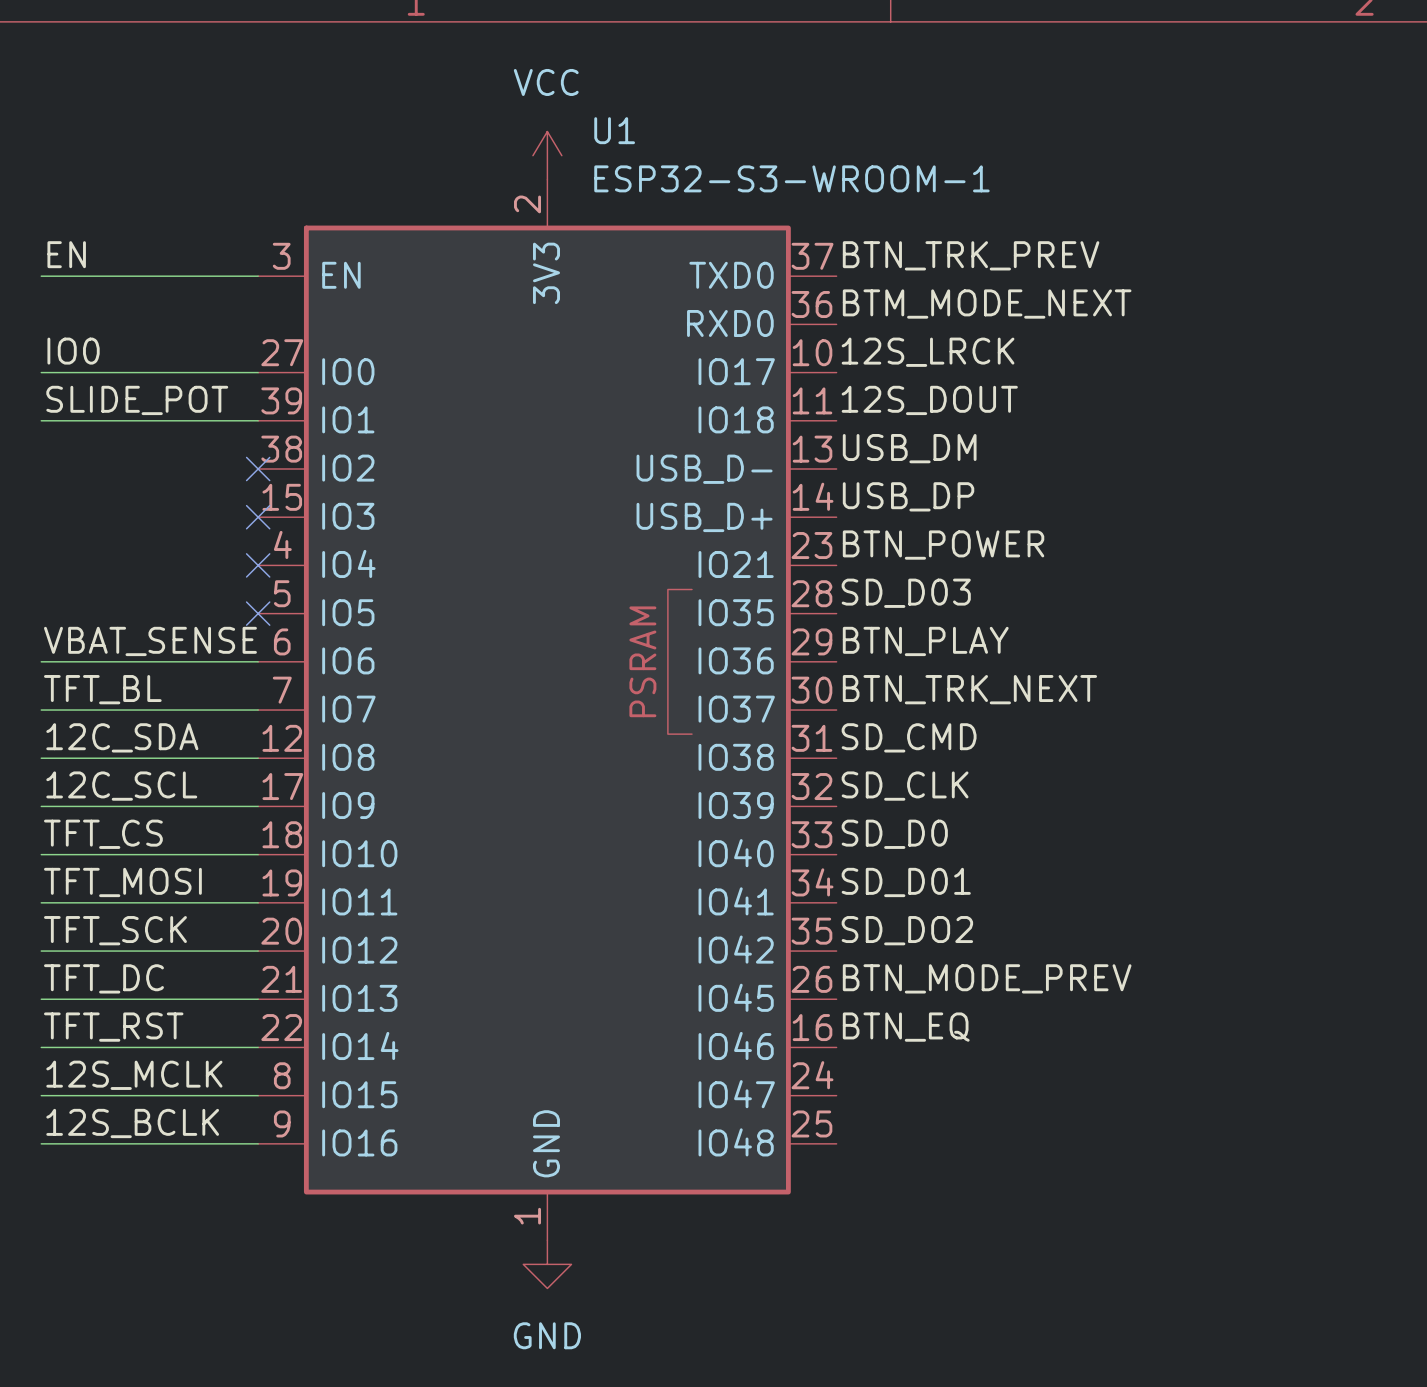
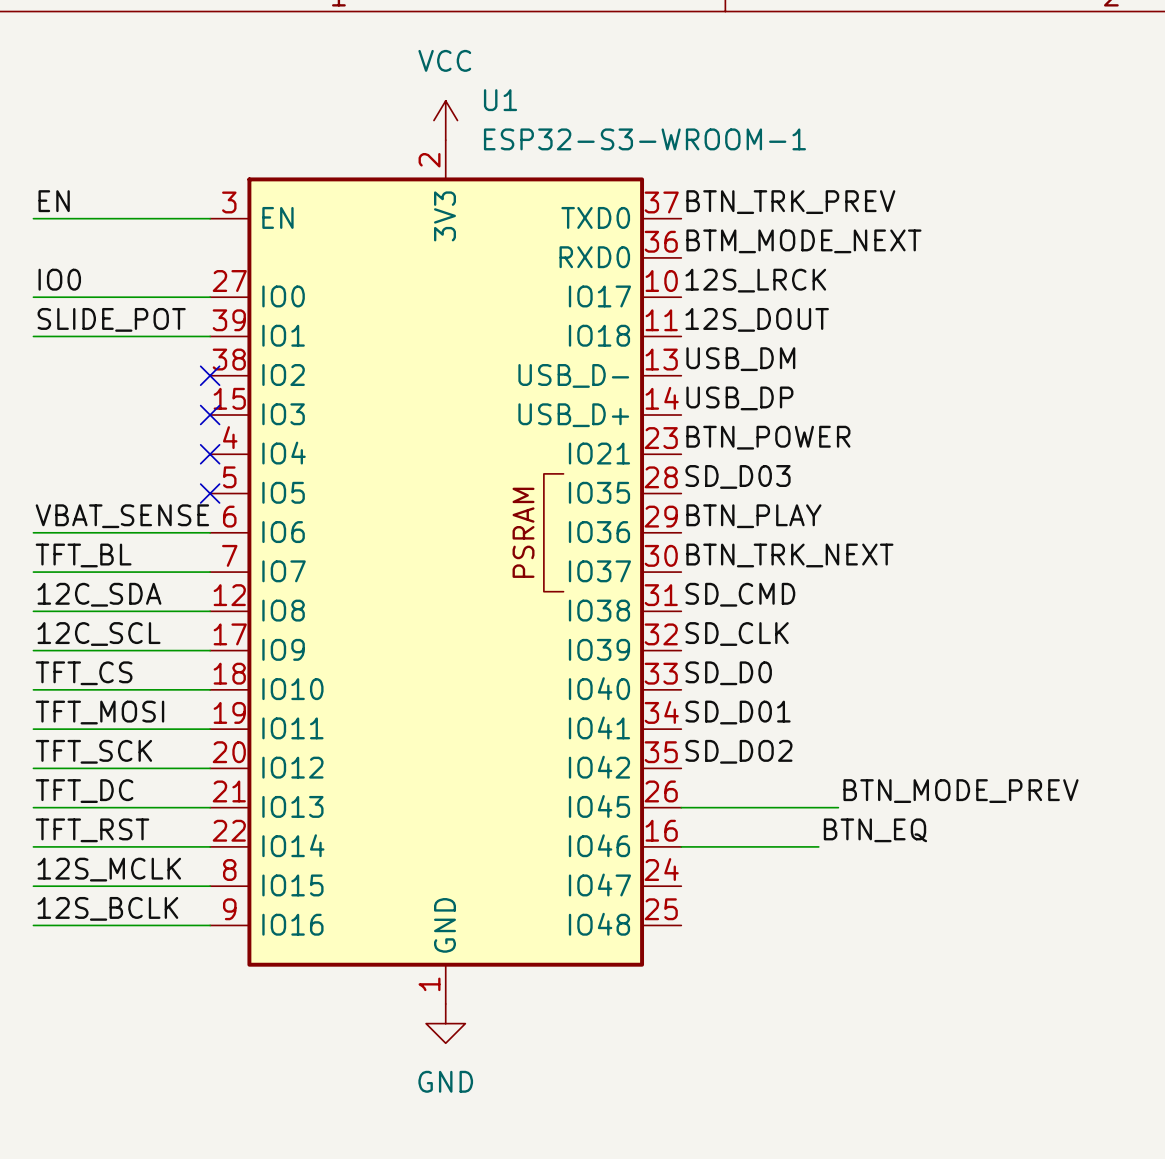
label position: BTN_MODE_PREV (987, 978) -> BTN_MODE_PREV (961, 791)
wire: none -> (681, 807) (838, 807)
label position: BTN_EQ (906, 1027) -> BTN_EQ (875, 830)
wire: none -> (681, 846) (818, 846)

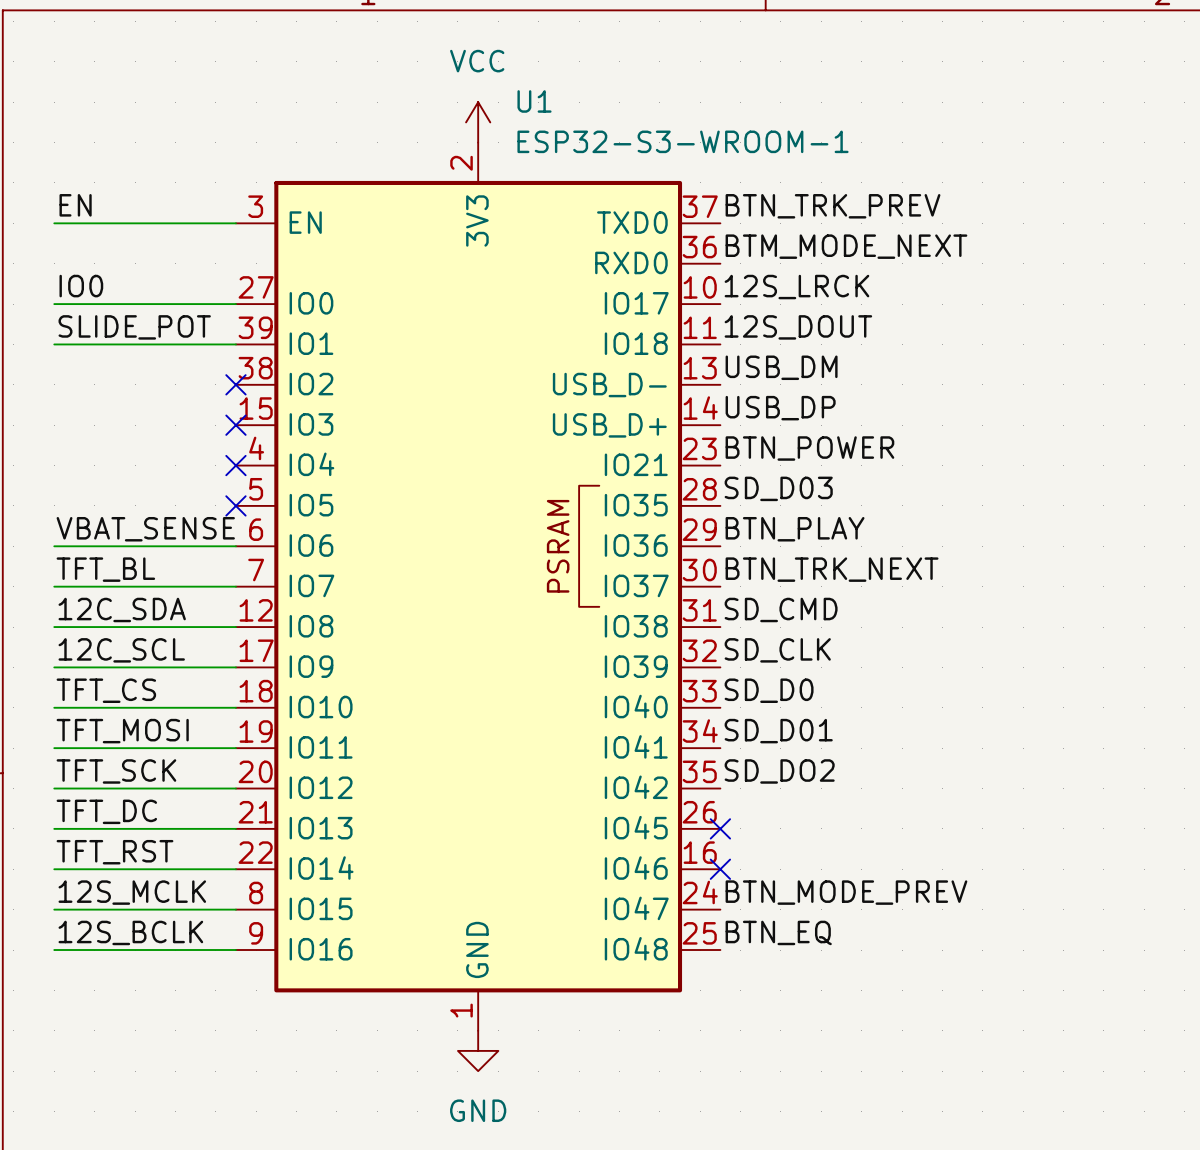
label position: BTN_MODE_PREV (961, 791) -> BTN_MODE_PREV (846, 892)
wire: (681, 807) (838, 807) -> none
no-connect mark: none -> (720, 828)
label position: BTN_EQ (875, 830) -> BTN_EQ (778, 932)
wire: (681, 846) (818, 846) -> none
no-connect mark: none -> (720, 869)

